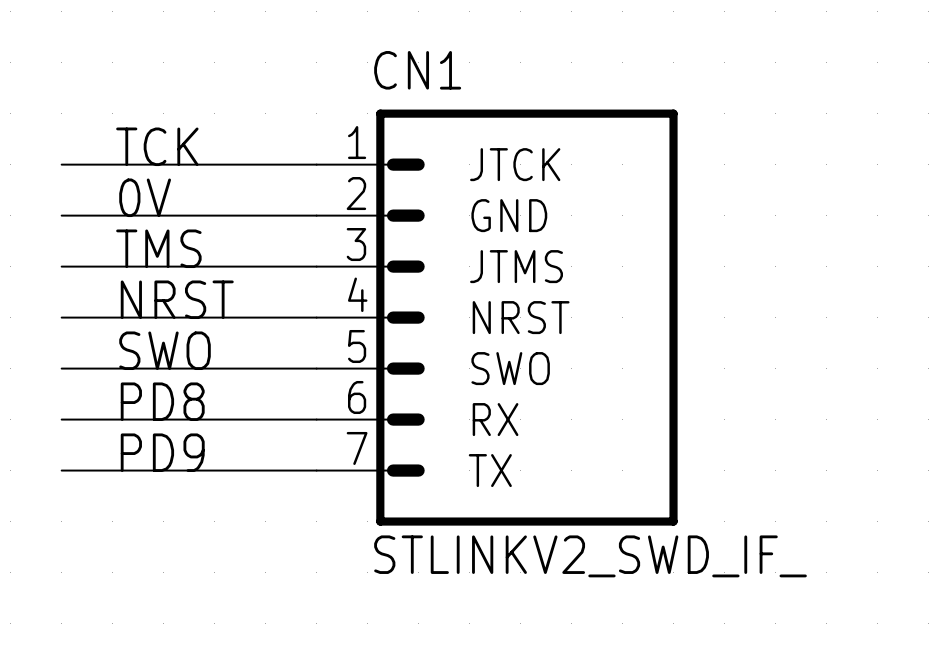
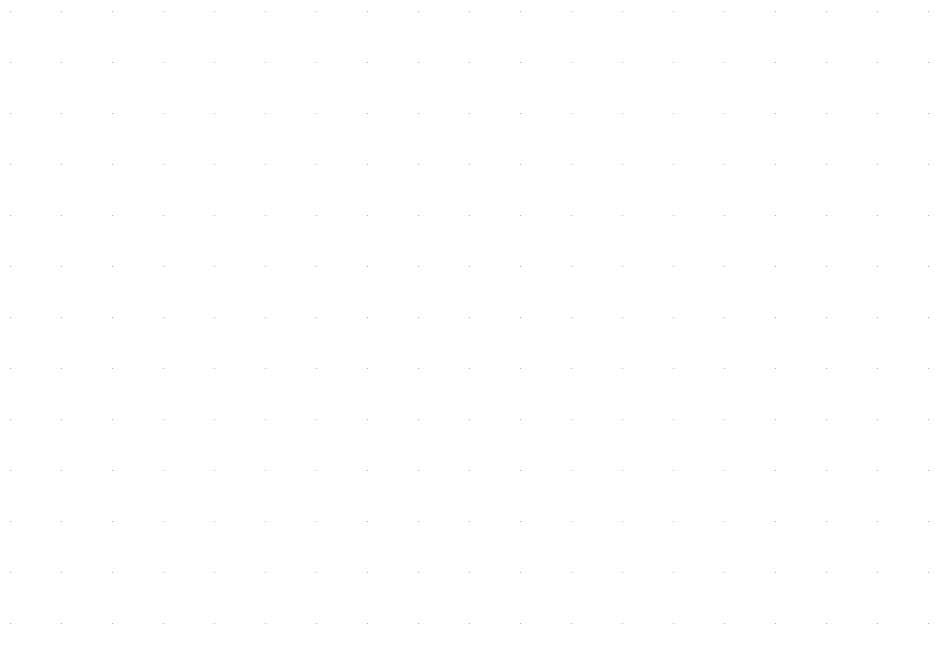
label: TCK (157, 146) -> none
wire: (61, 164) (316, 164) -> none
label: 0V (145, 197) -> none
wire: (61, 215) (316, 215) -> none
label: TMS (158, 248) -> none
wire: (61, 266) (316, 266) -> none
label: NRST (177, 299) -> none
wire: (61, 317) (316, 317) -> none
CN1: STLINKV2_SWD_IF_ (497, 317) -> none
label: SWO (165, 350) -> none
wire: (61, 368) (316, 368) -> none
label: PD8 (162, 401) -> none
wire: (61, 419) (316, 419) -> none
label: PD9 (162, 452) -> none
wire: (61, 470) (316, 470) -> none

